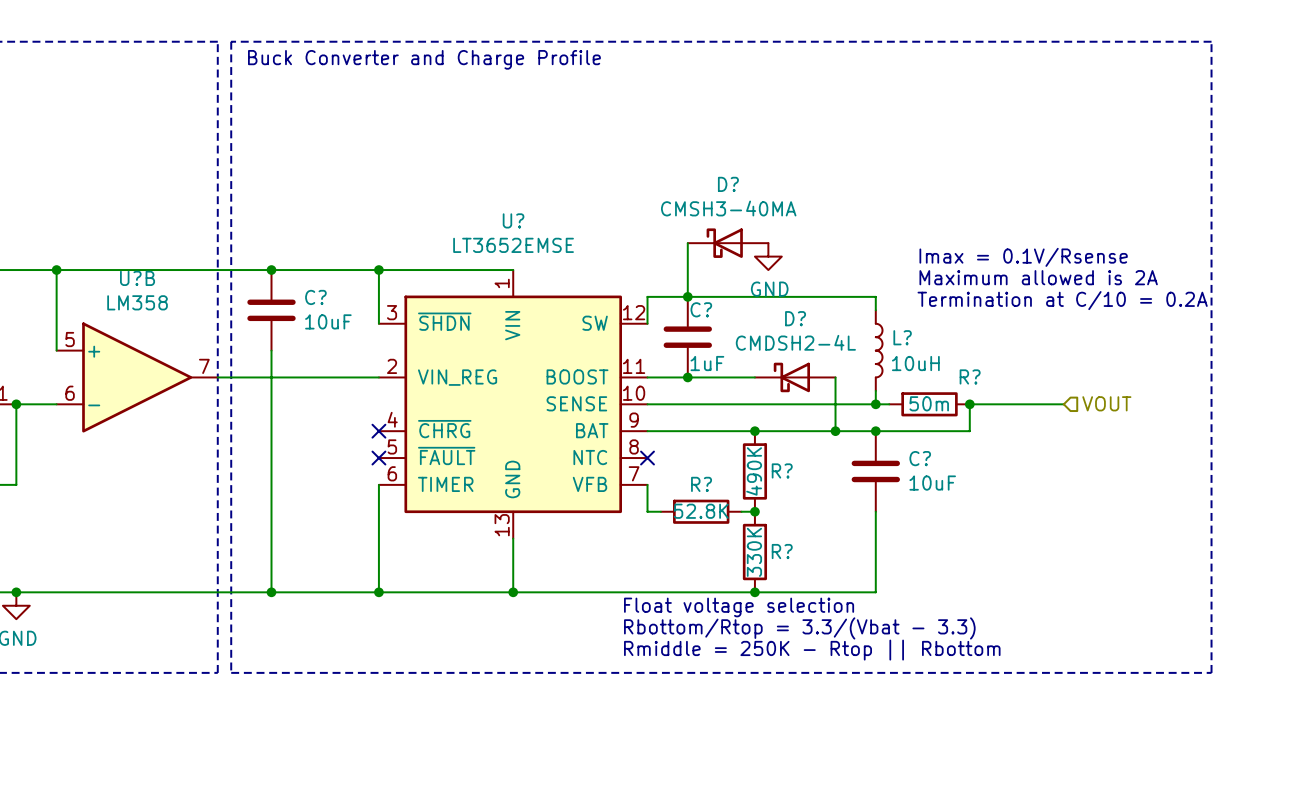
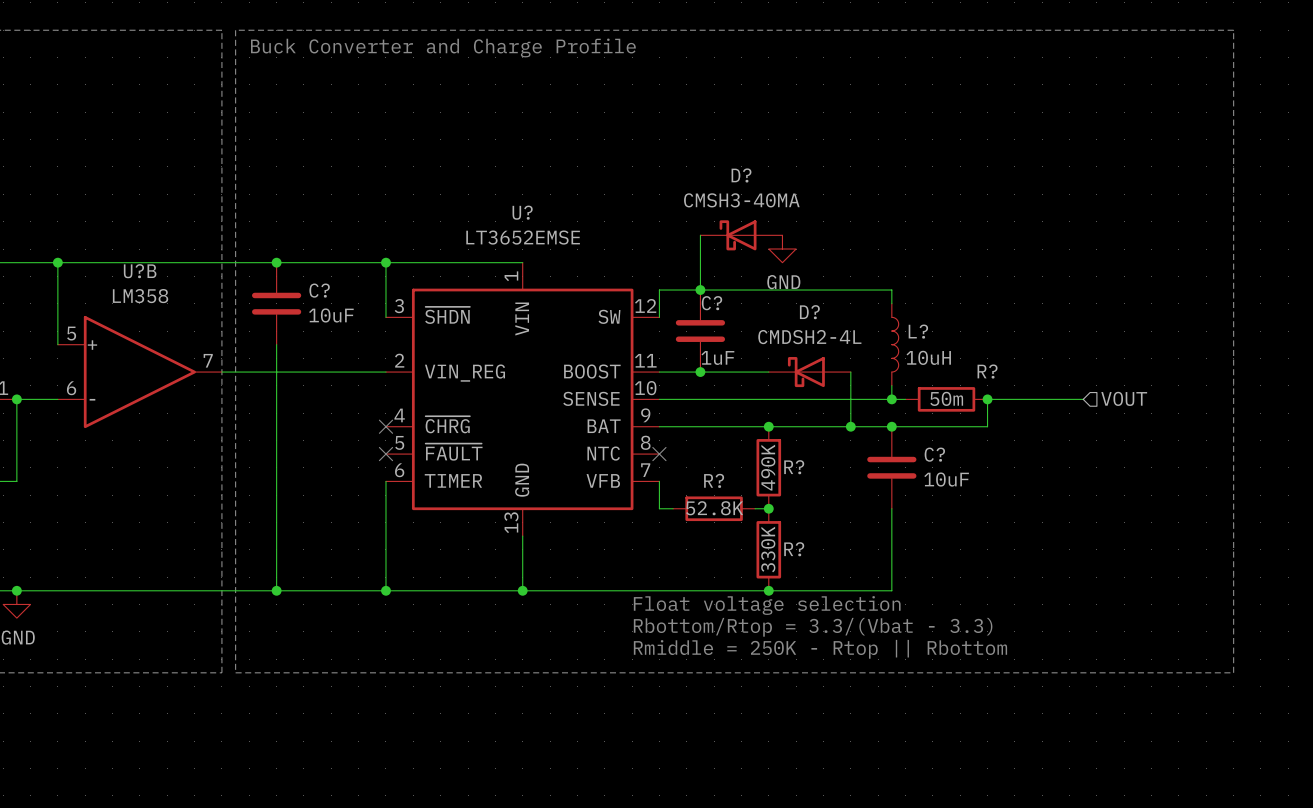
text: Imax = 0.1V/Rsense (1023, 257) -> none
text: Maximum allowed is 2A (1038, 277) -> none
text: Termination at C/10 = 0.2A (1062, 300) -> none

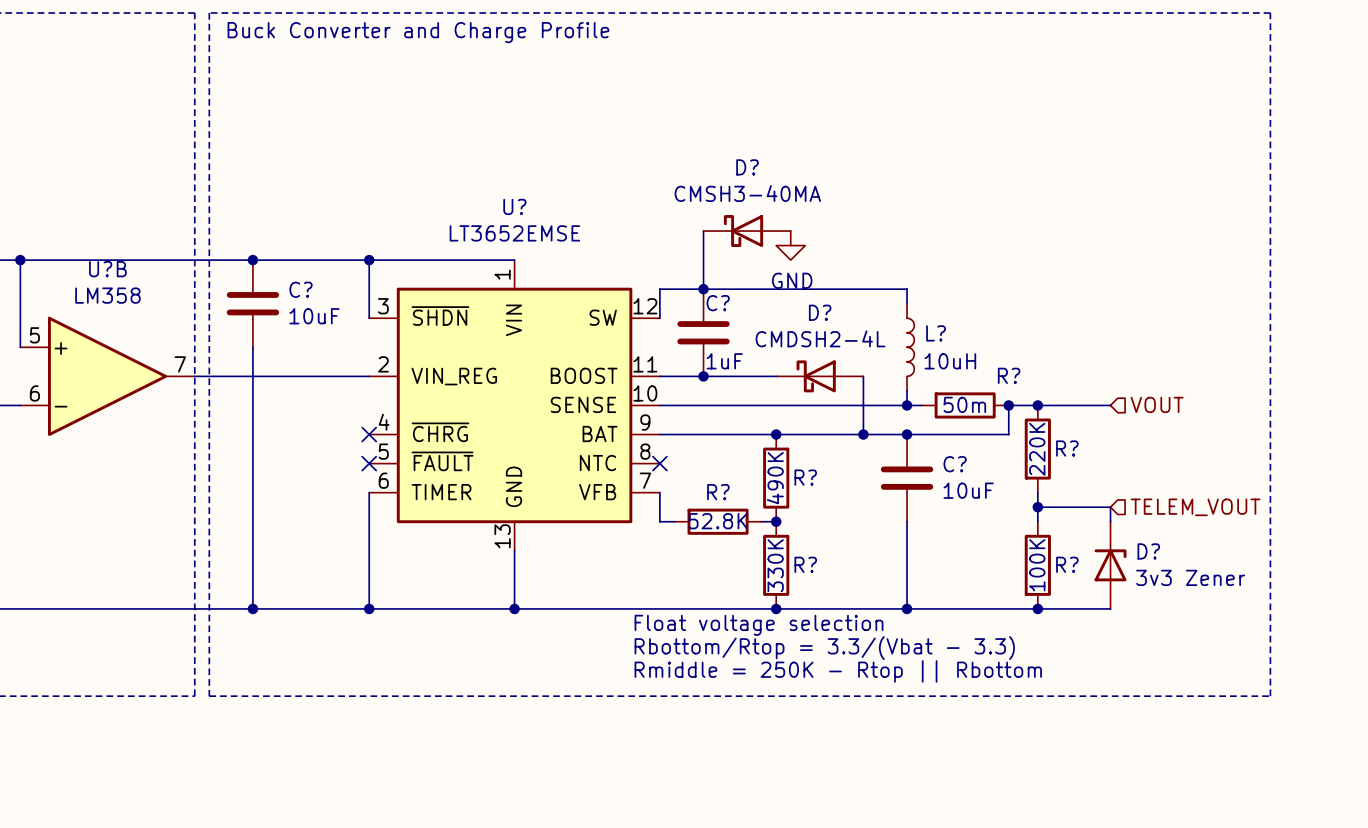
junction: none -> (1037, 405)
R?: none -> 220K (1037, 449)
wire: none -> (1037, 492) (1037, 521)
wire: none -> (1037, 507) (1110, 507) (1110, 521)
junction: none -> (1037, 507)
hierarchical label: none -> TELEM_VOUT (1195, 507)
R?: none -> 100K (1037, 565)
D?: none -> 3v3 Zener (1110, 565)
wire: none -> (907, 608) (1110, 608)
junction: none -> (907, 608)
junction: none -> (1037, 608)

